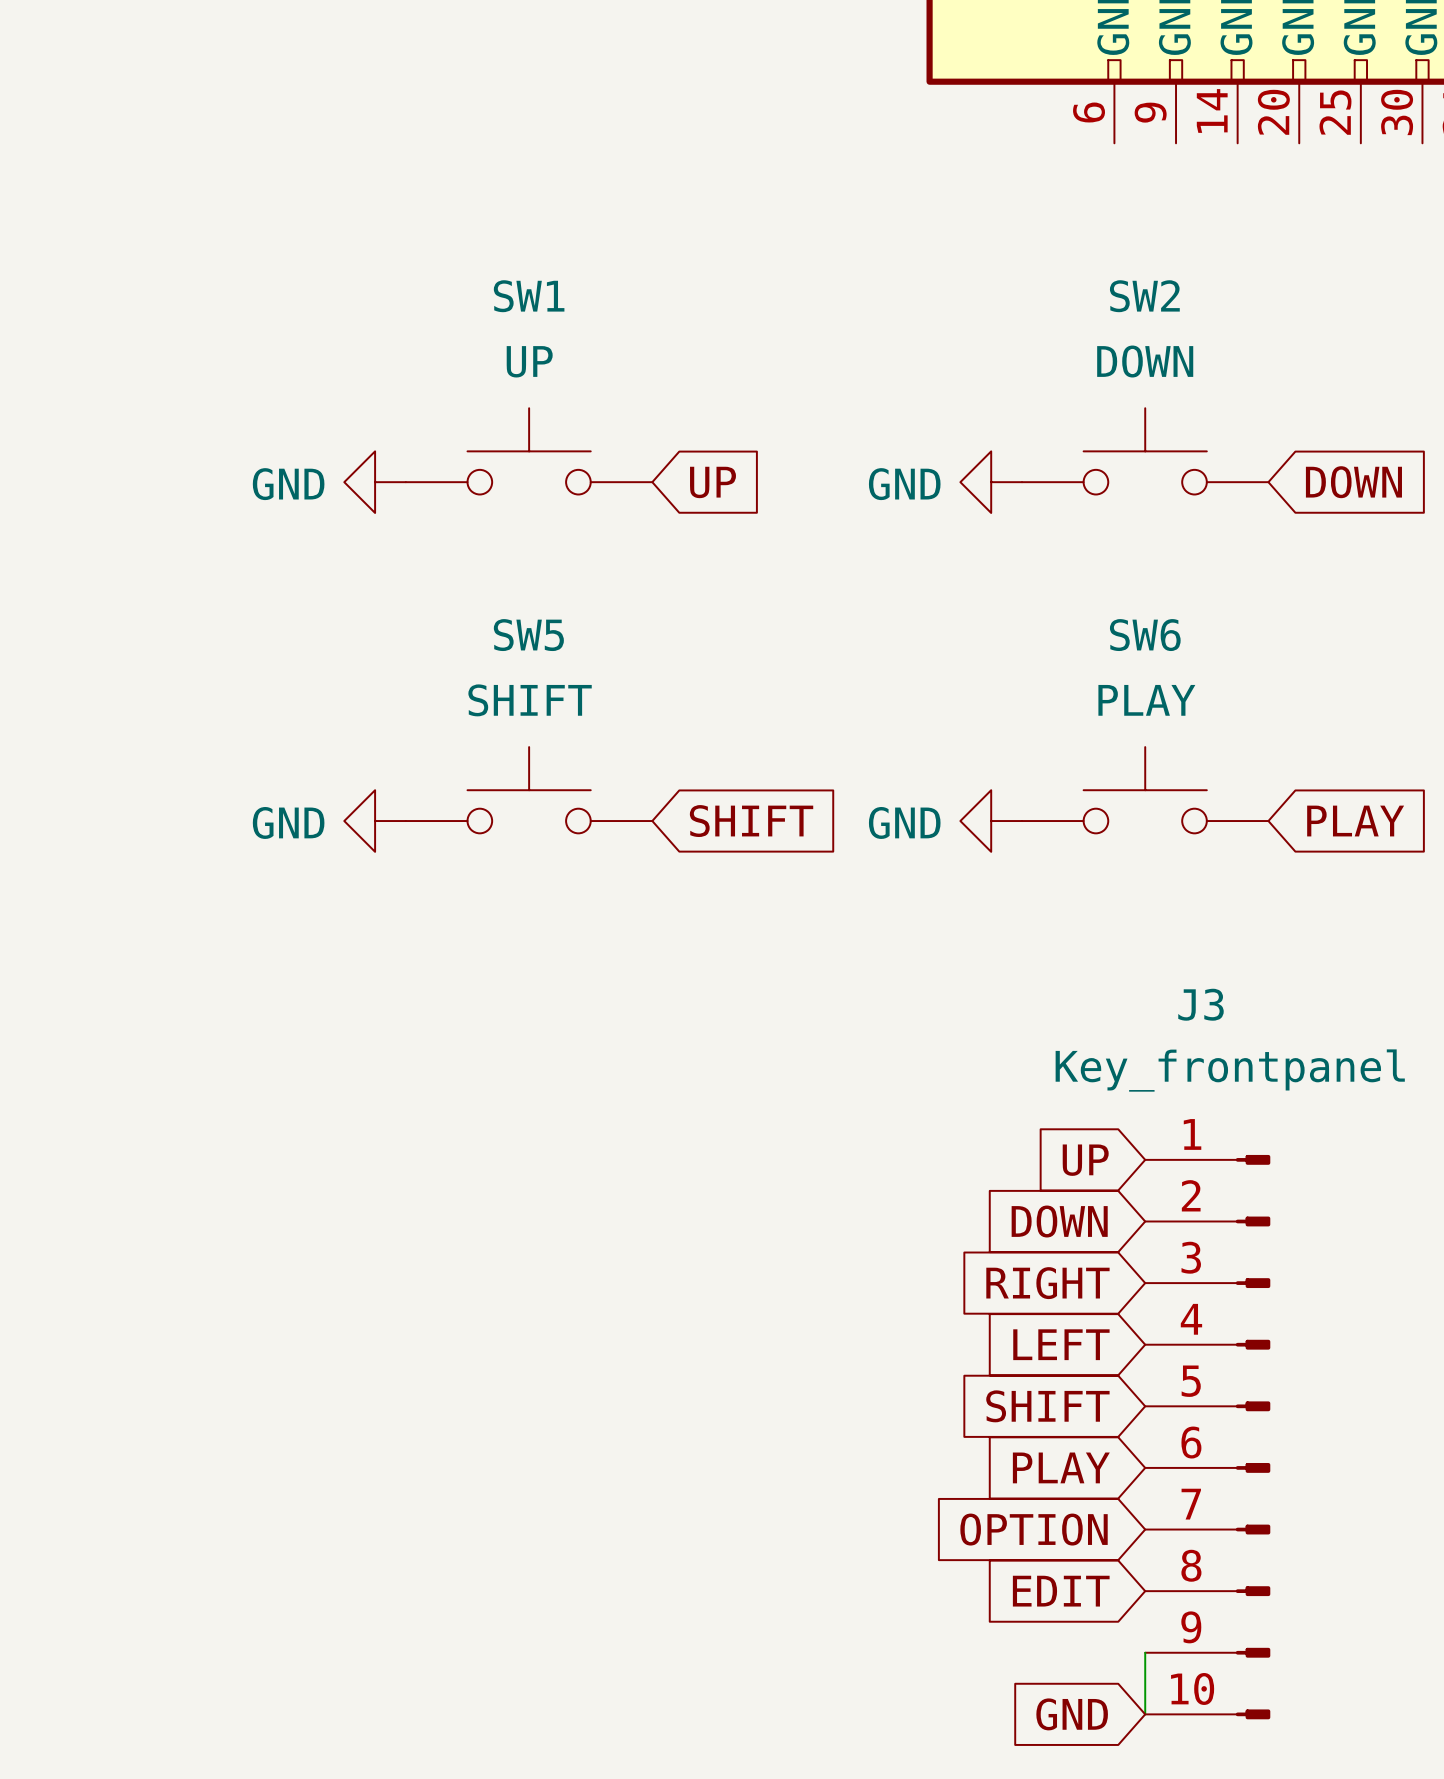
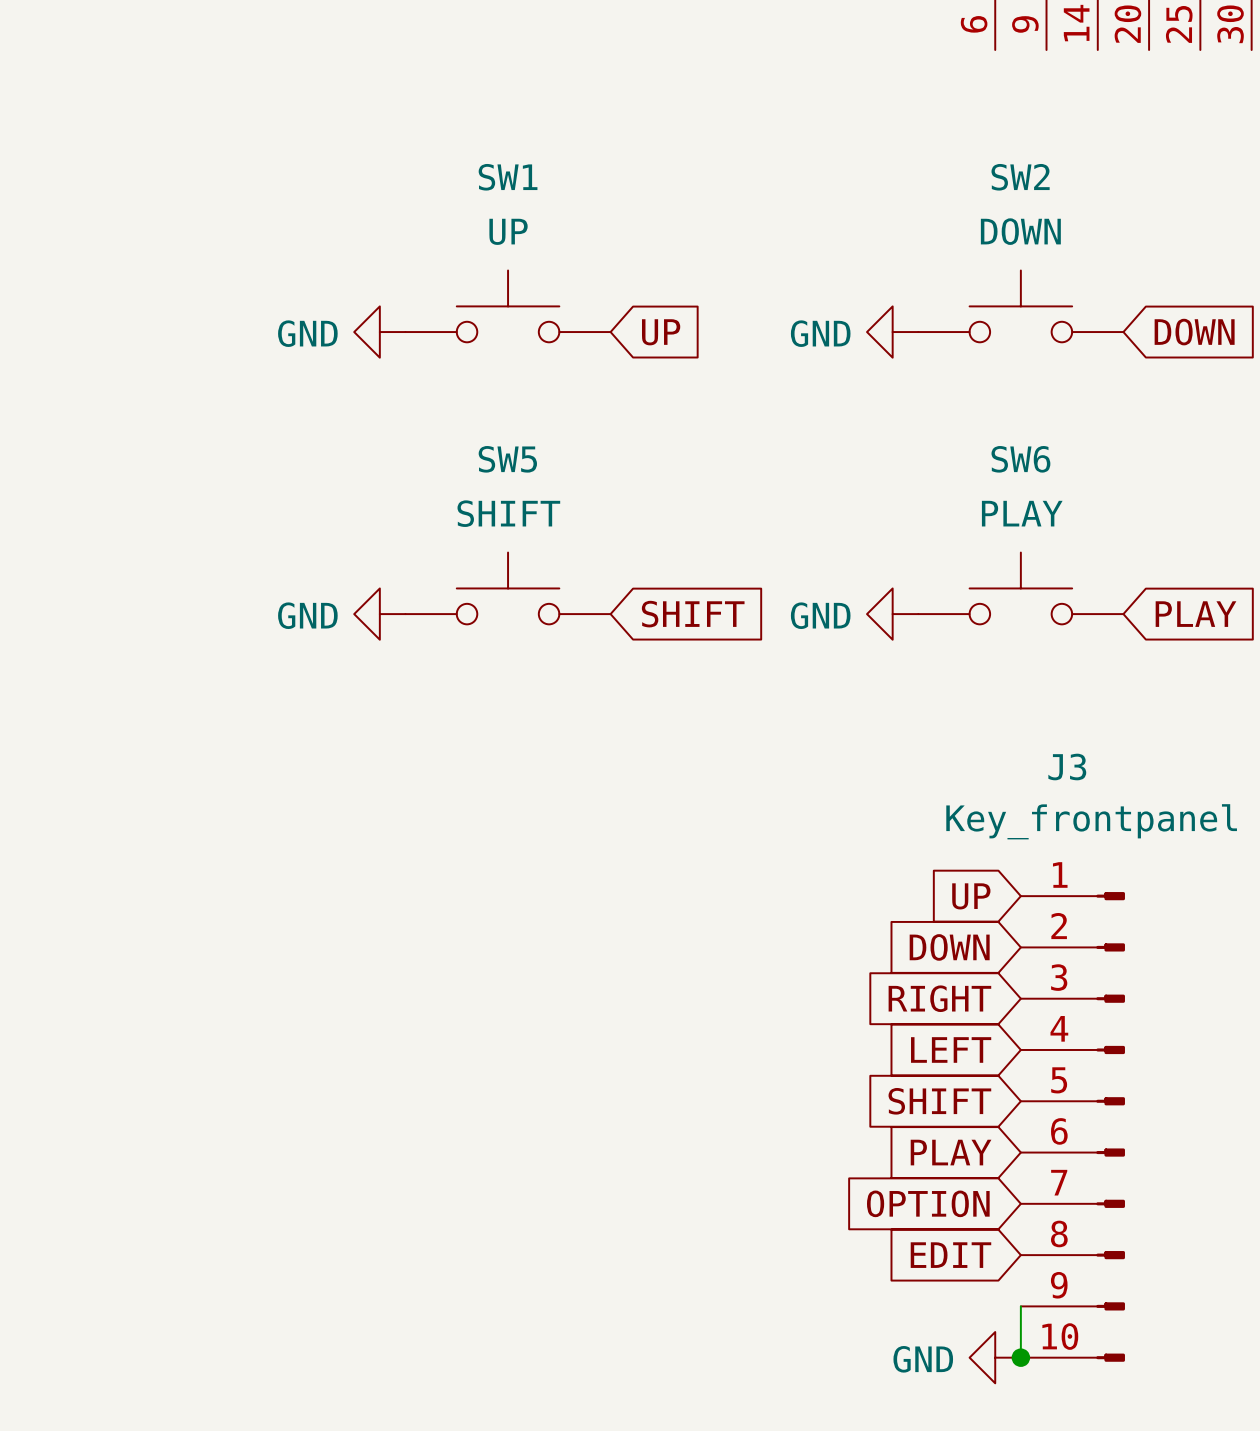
global label: GND (1072, 1714) -> none
power symbol: none -> GND (995, 1357)
junction: none -> (1020, 1357)

